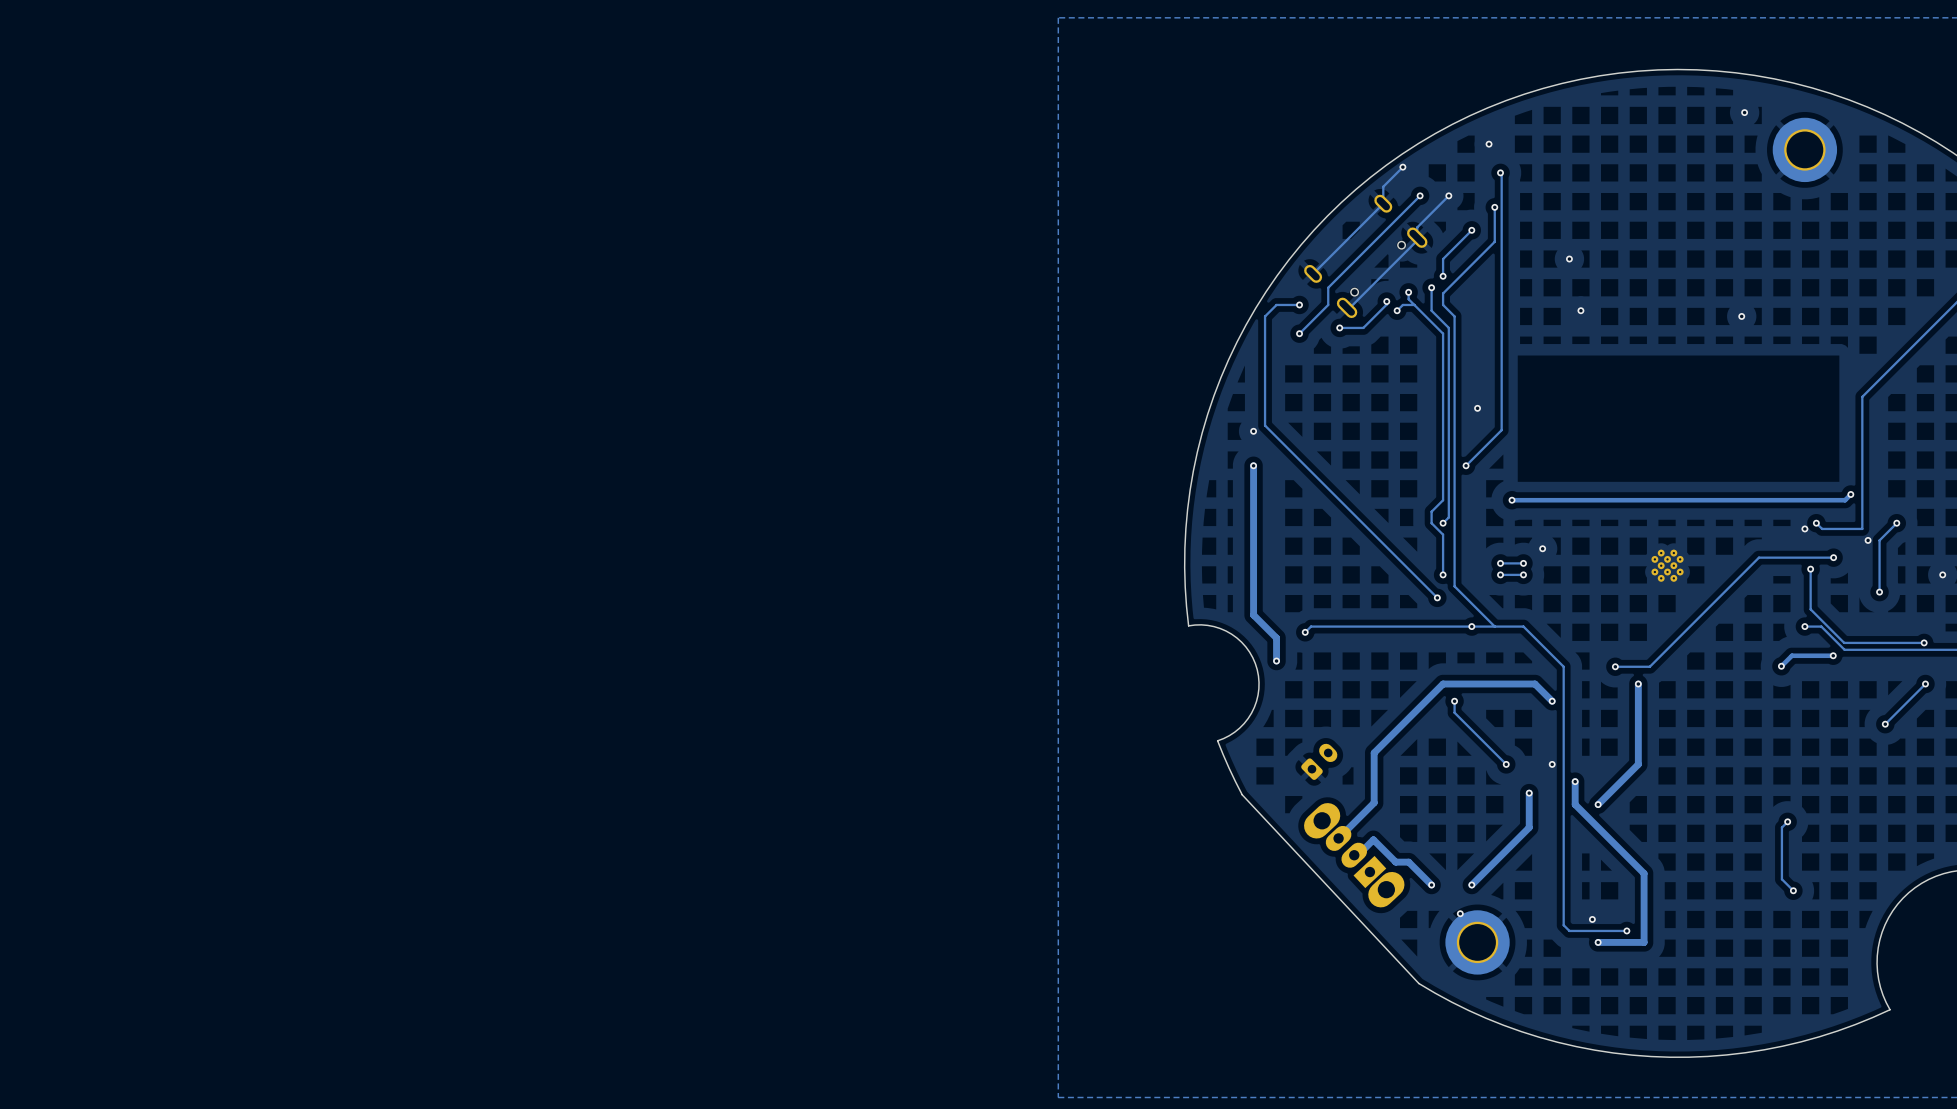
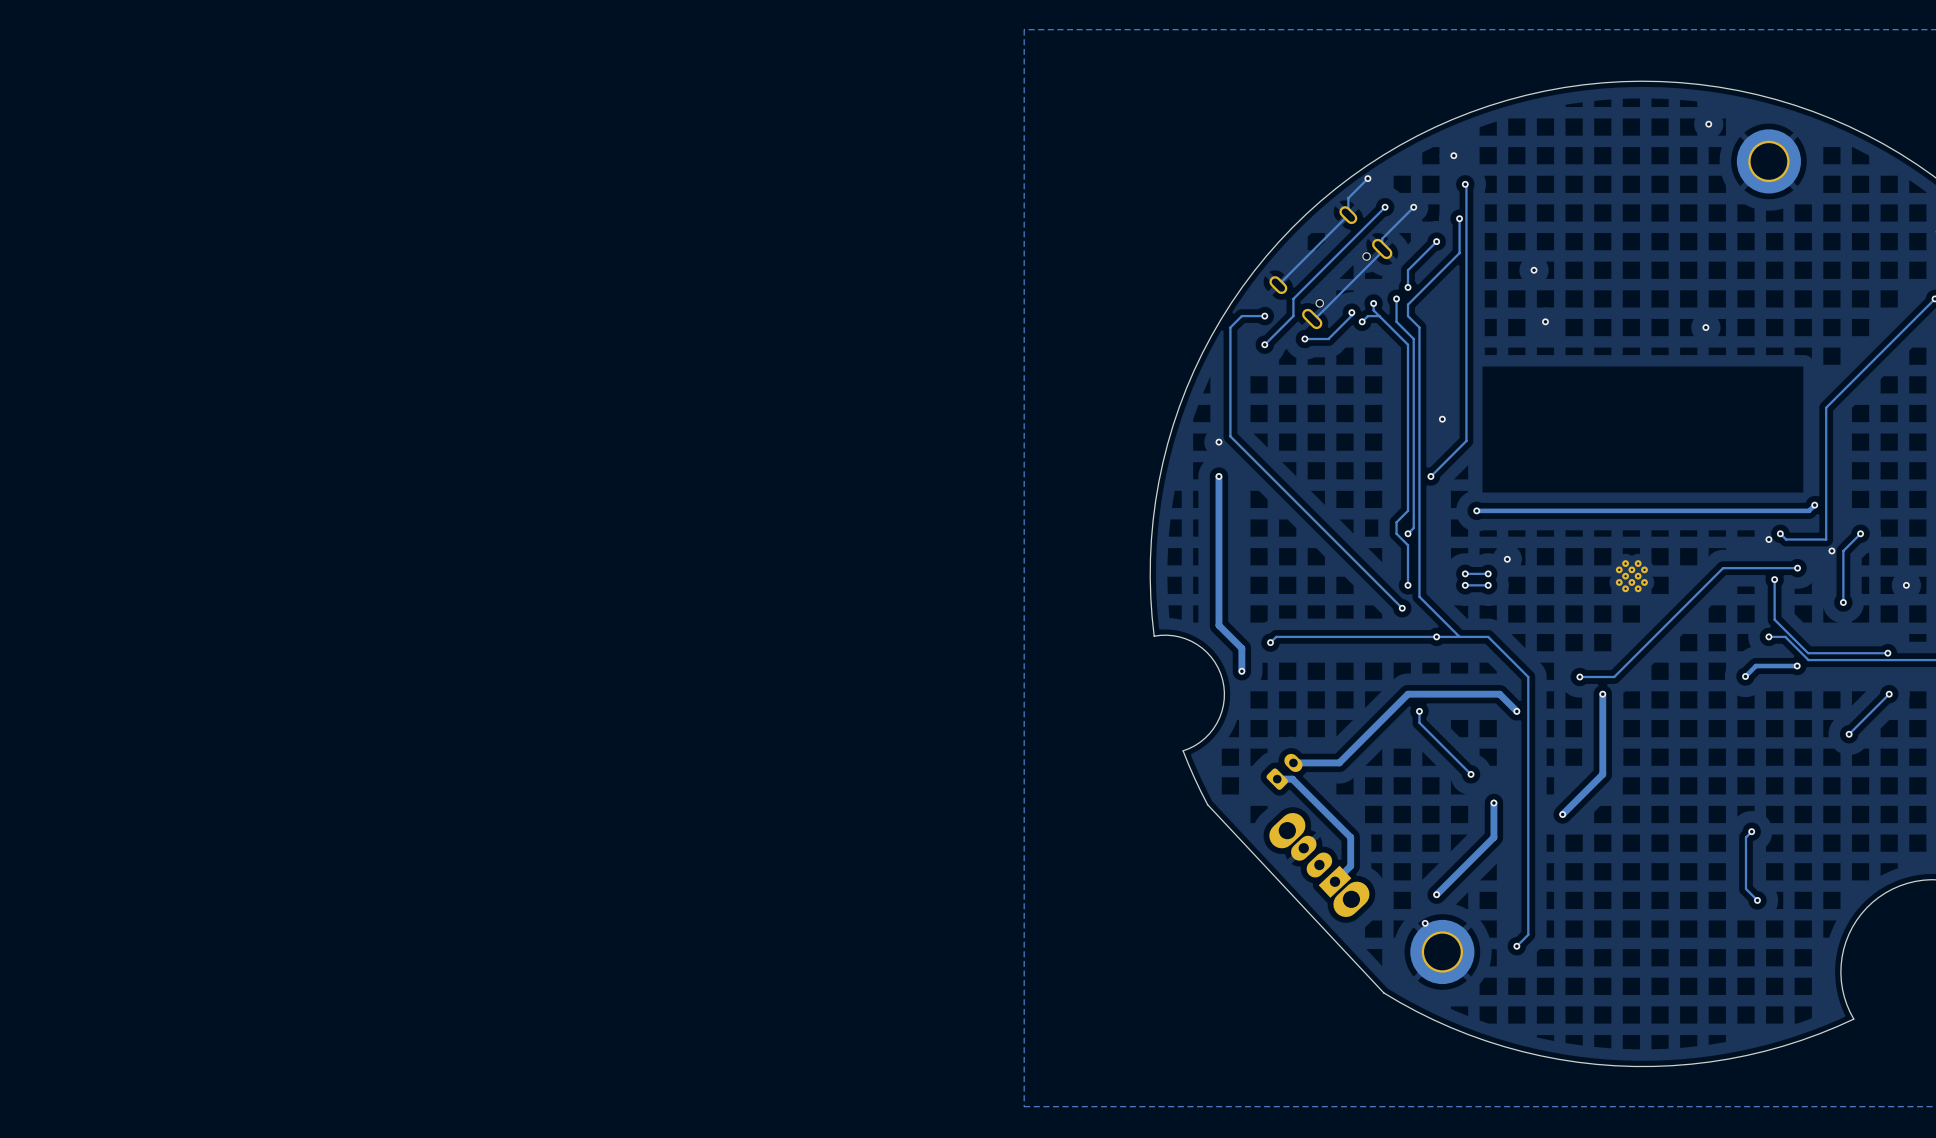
track: (1374, 752) (1374, 802) (1338, 838) -> (1339, 762) (1293, 762)
via: (1552, 764) -> none
track: none -> (1277, 779) (1292, 779) (1350, 837) (1350, 866) (1335, 881)
track: (1575, 781) (1575, 804) (1644, 873) (1644, 942) (1598, 942) -> none
via: (1575, 781) -> none
track: (1354, 855) (1358, 855) (1373, 839) (1395, 862) (1408, 862) (1431, 885) -> none
via: (1431, 885) -> none
via: (1592, 919) -> none
track: (1563, 925) (1569, 930) (1626, 930) -> (1528, 934) (1516, 946)
via: (1626, 930) -> none
via: none -> (1516, 946)
via: (1598, 942) -> none

